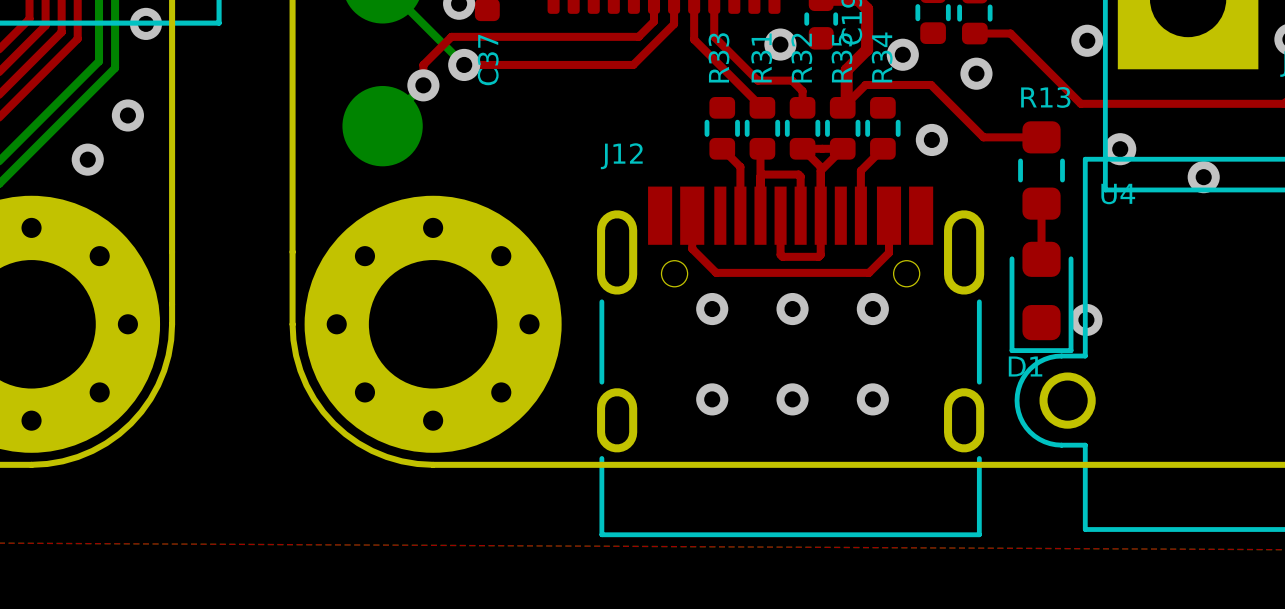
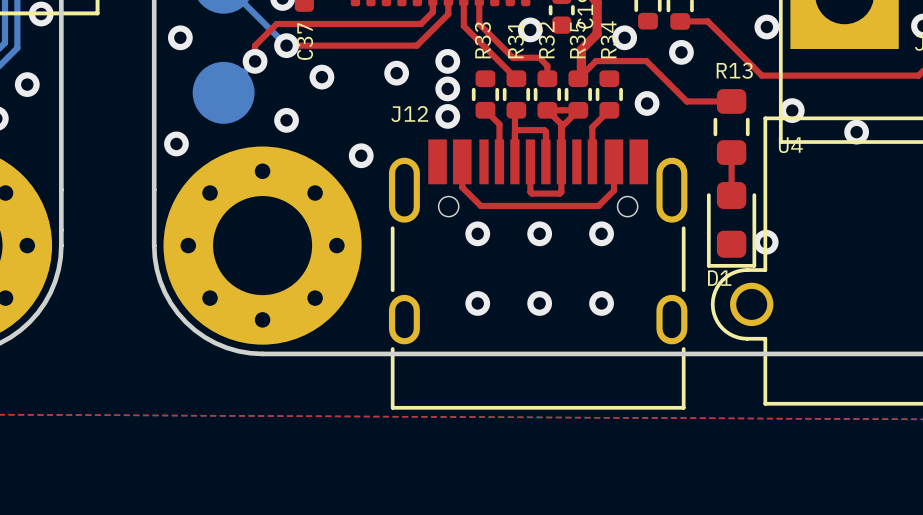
via: none -> (180, 37)
via: none -> (447, 61)
via: none -> (396, 73)
via: none -> (321, 77)
via: none -> (447, 88)
via: none -> (447, 116)
via: none -> (286, 120)
via: none -> (176, 143)
via: none -> (361, 155)

